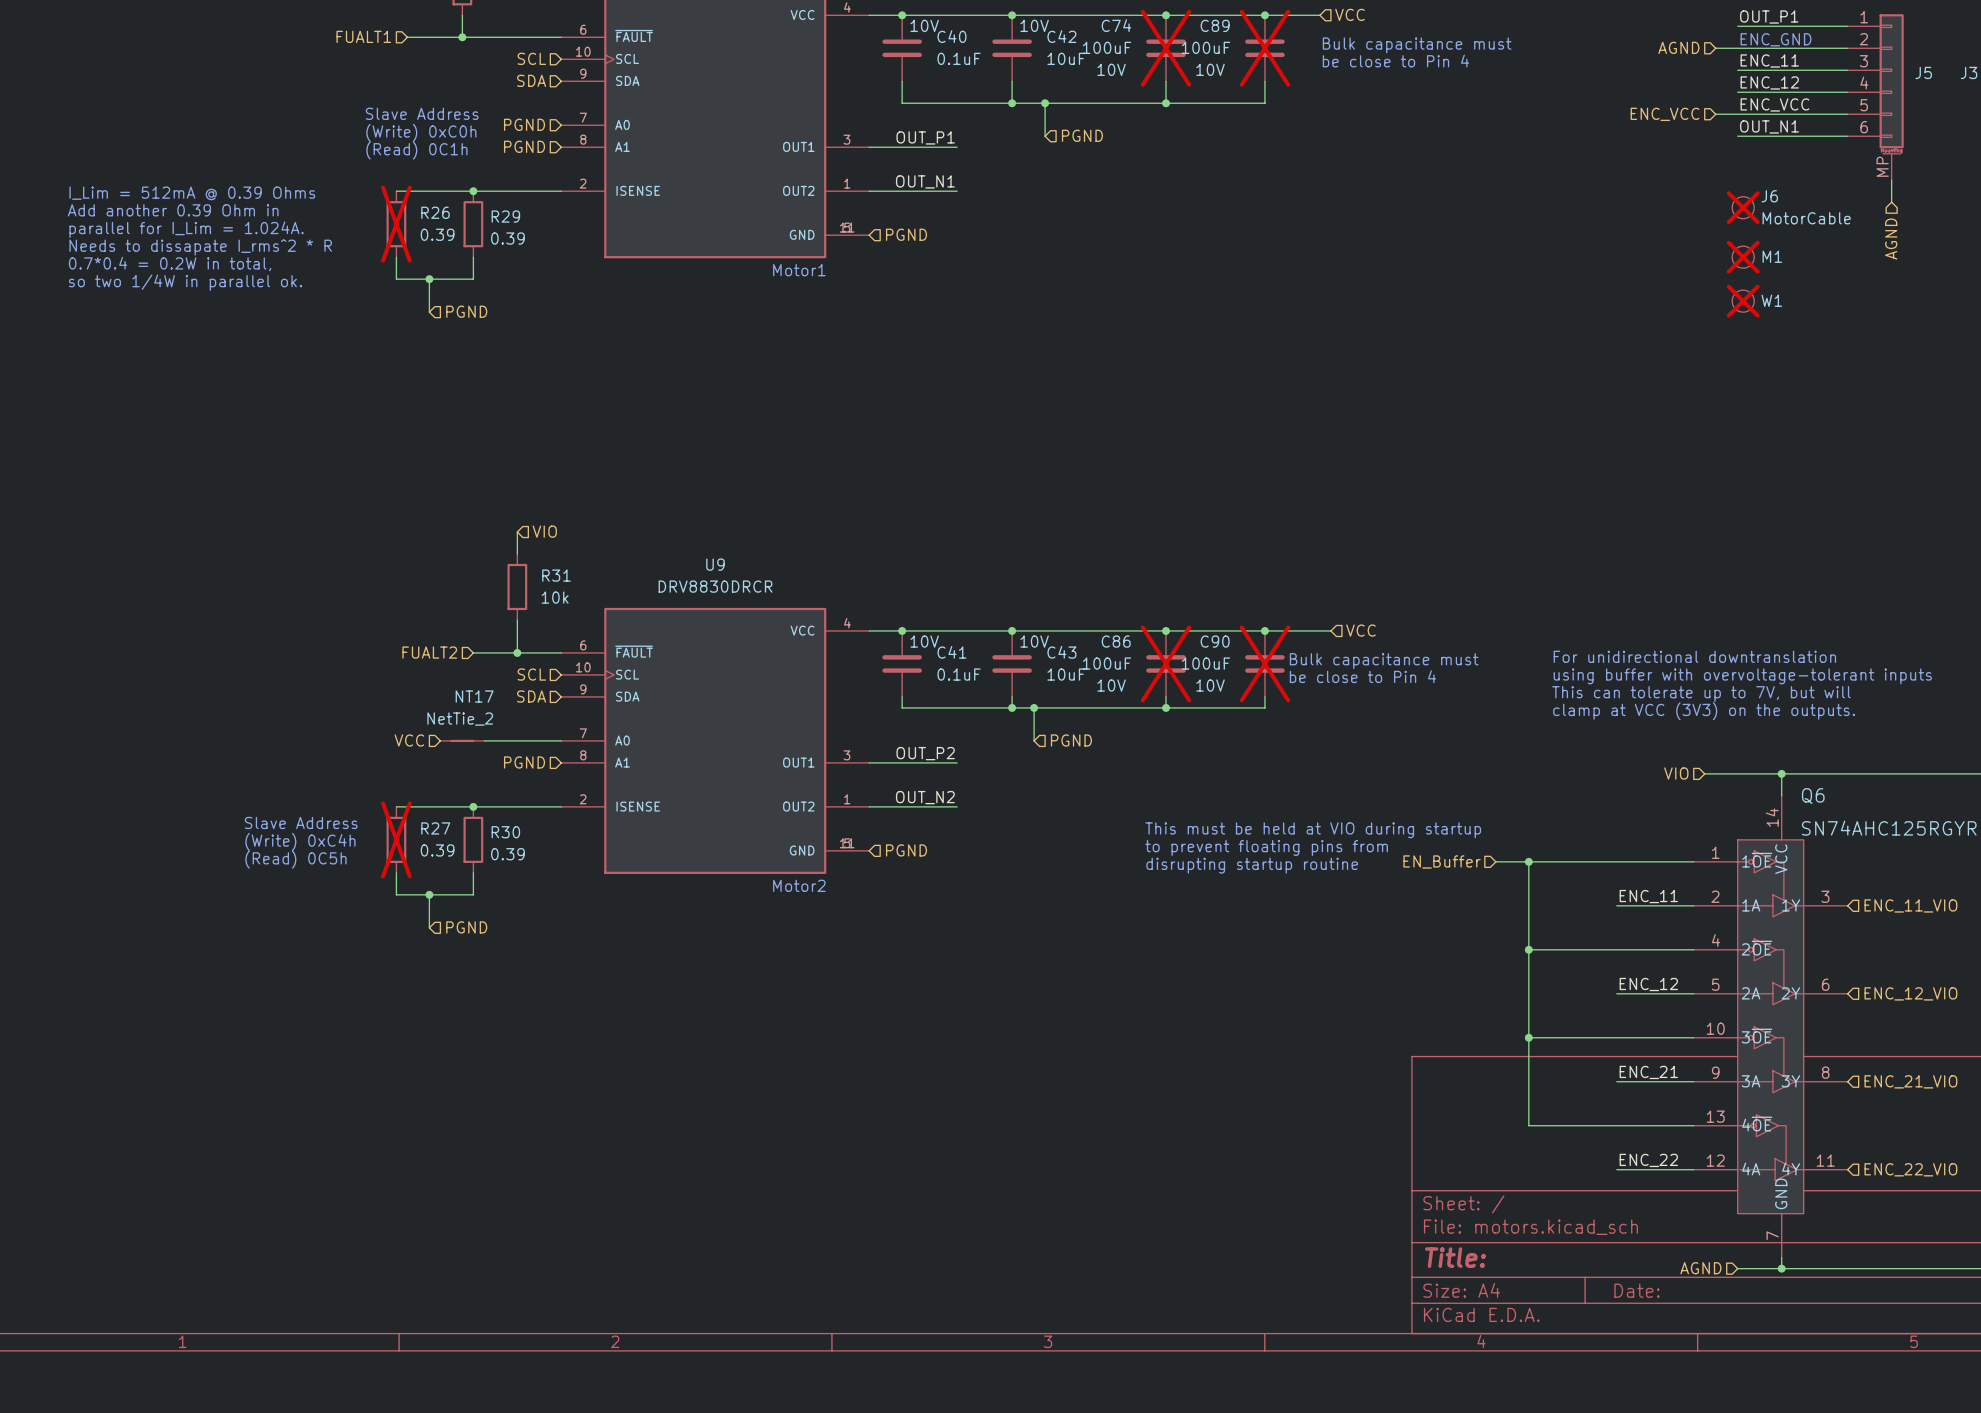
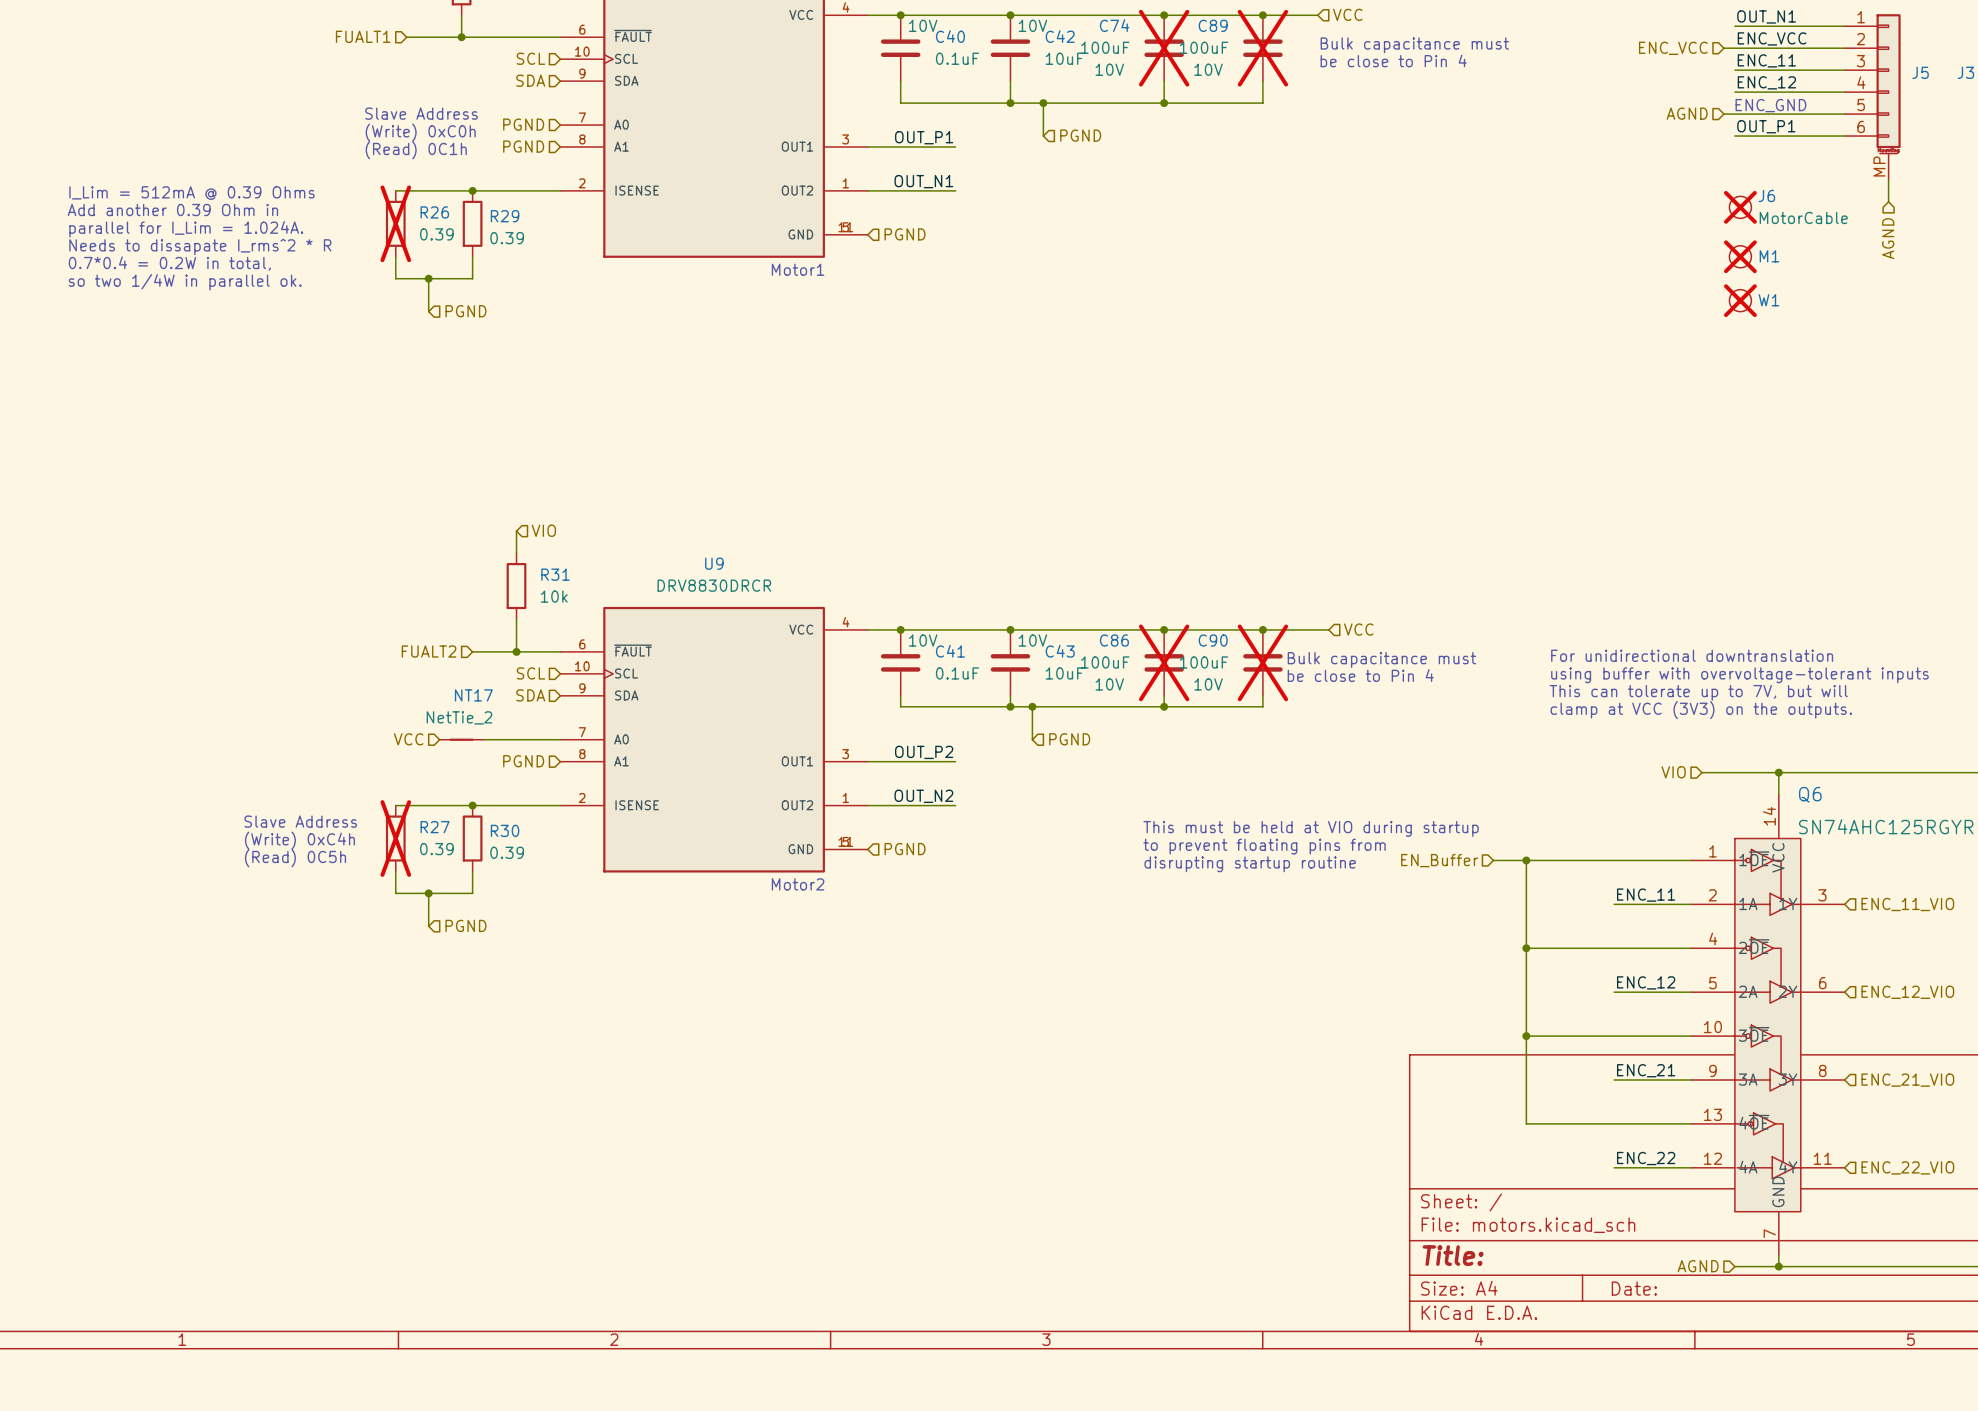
label: OUT_P1 (1769, 17) -> OUT_N1 (1766, 16)
text position: ENC_GND (1776, 39) -> ENC_GND (1770, 105)
hierarchical label position: AGND (1678, 47) -> AGND (1687, 113)
wire: (1715, 48) (1726, 48) -> none
label position: ENC_VCC (1774, 104) -> ENC_VCC (1772, 38)
hierarchical label position: ENC_VCC (1665, 114) -> ENC_VCC (1673, 48)
wire: (1715, 114) (1726, 114) -> none
label: OUT_N1 (1769, 126) -> OUT_P1 (1766, 126)

